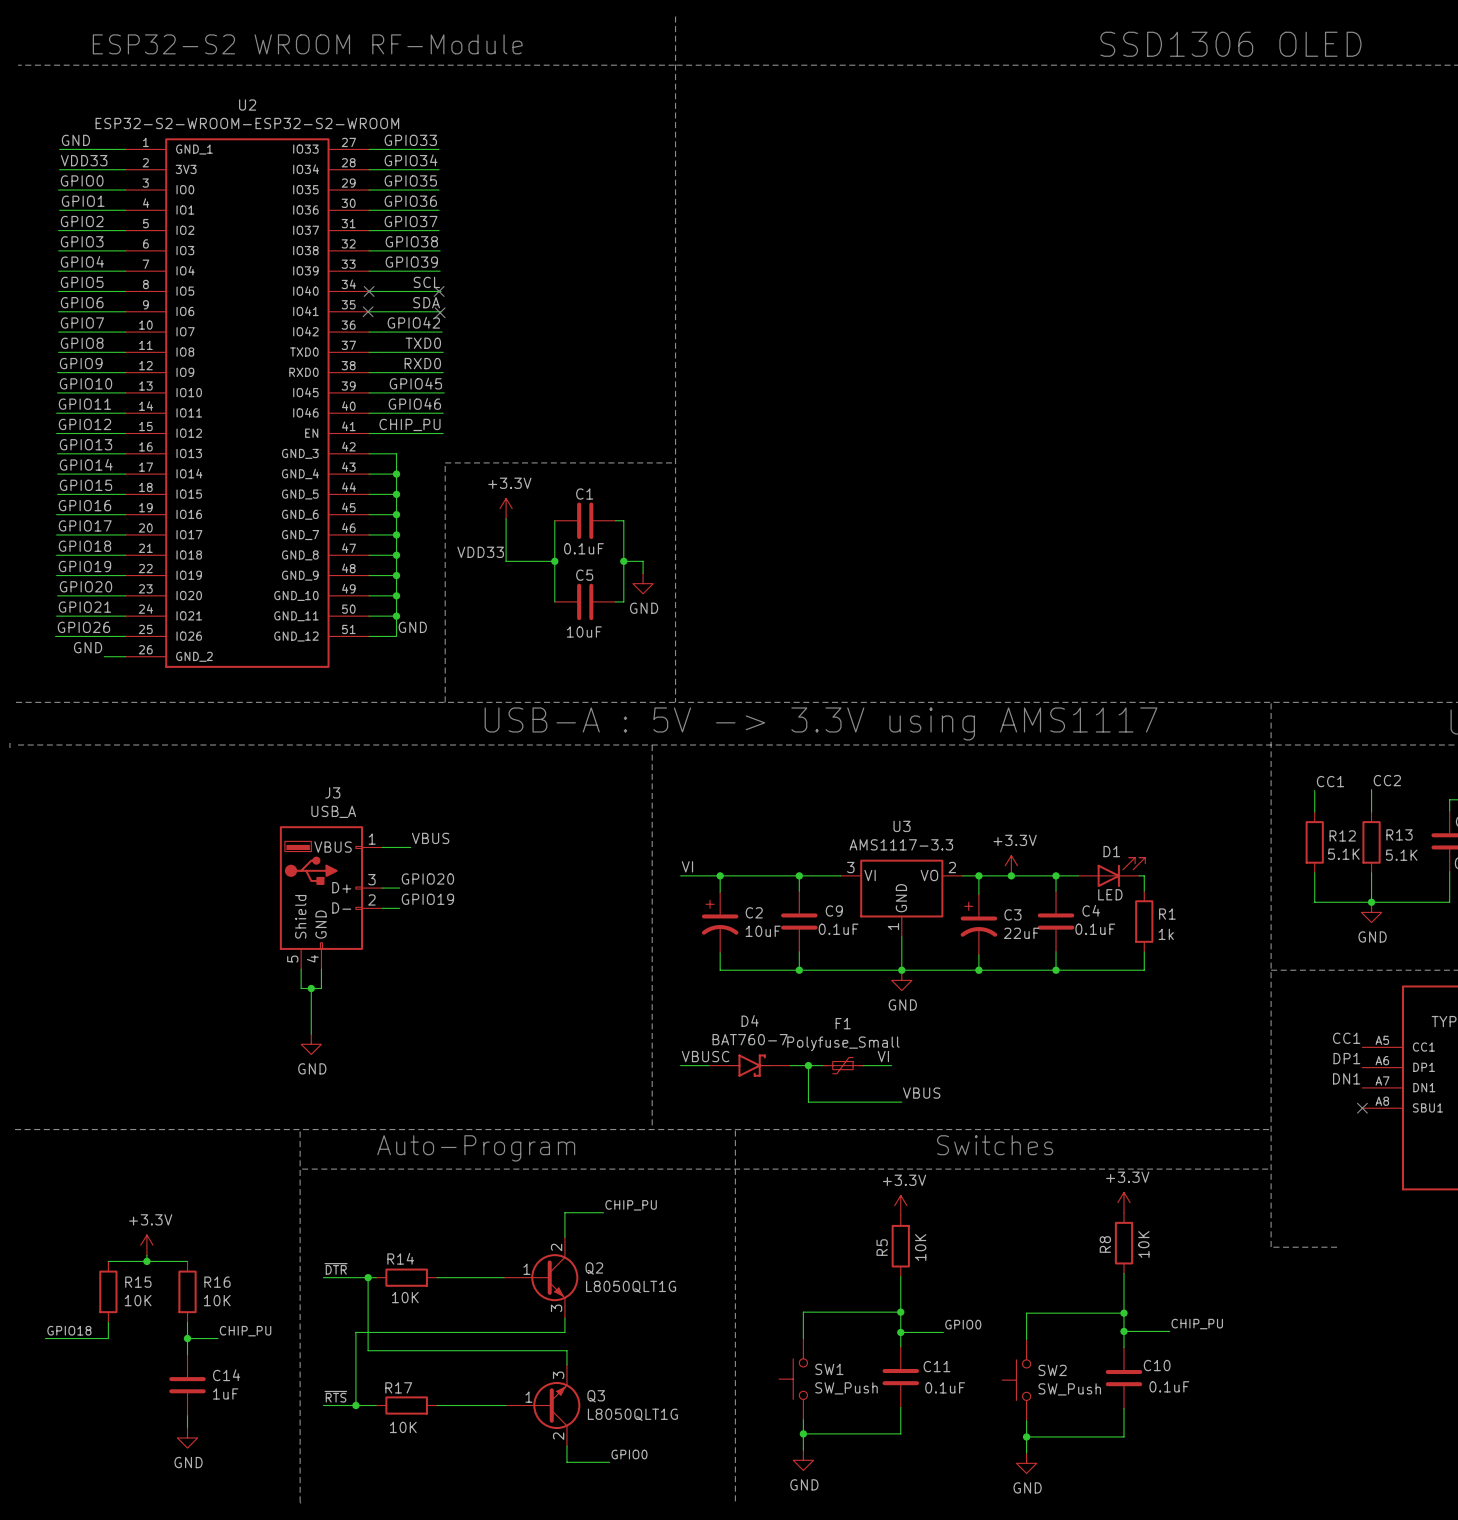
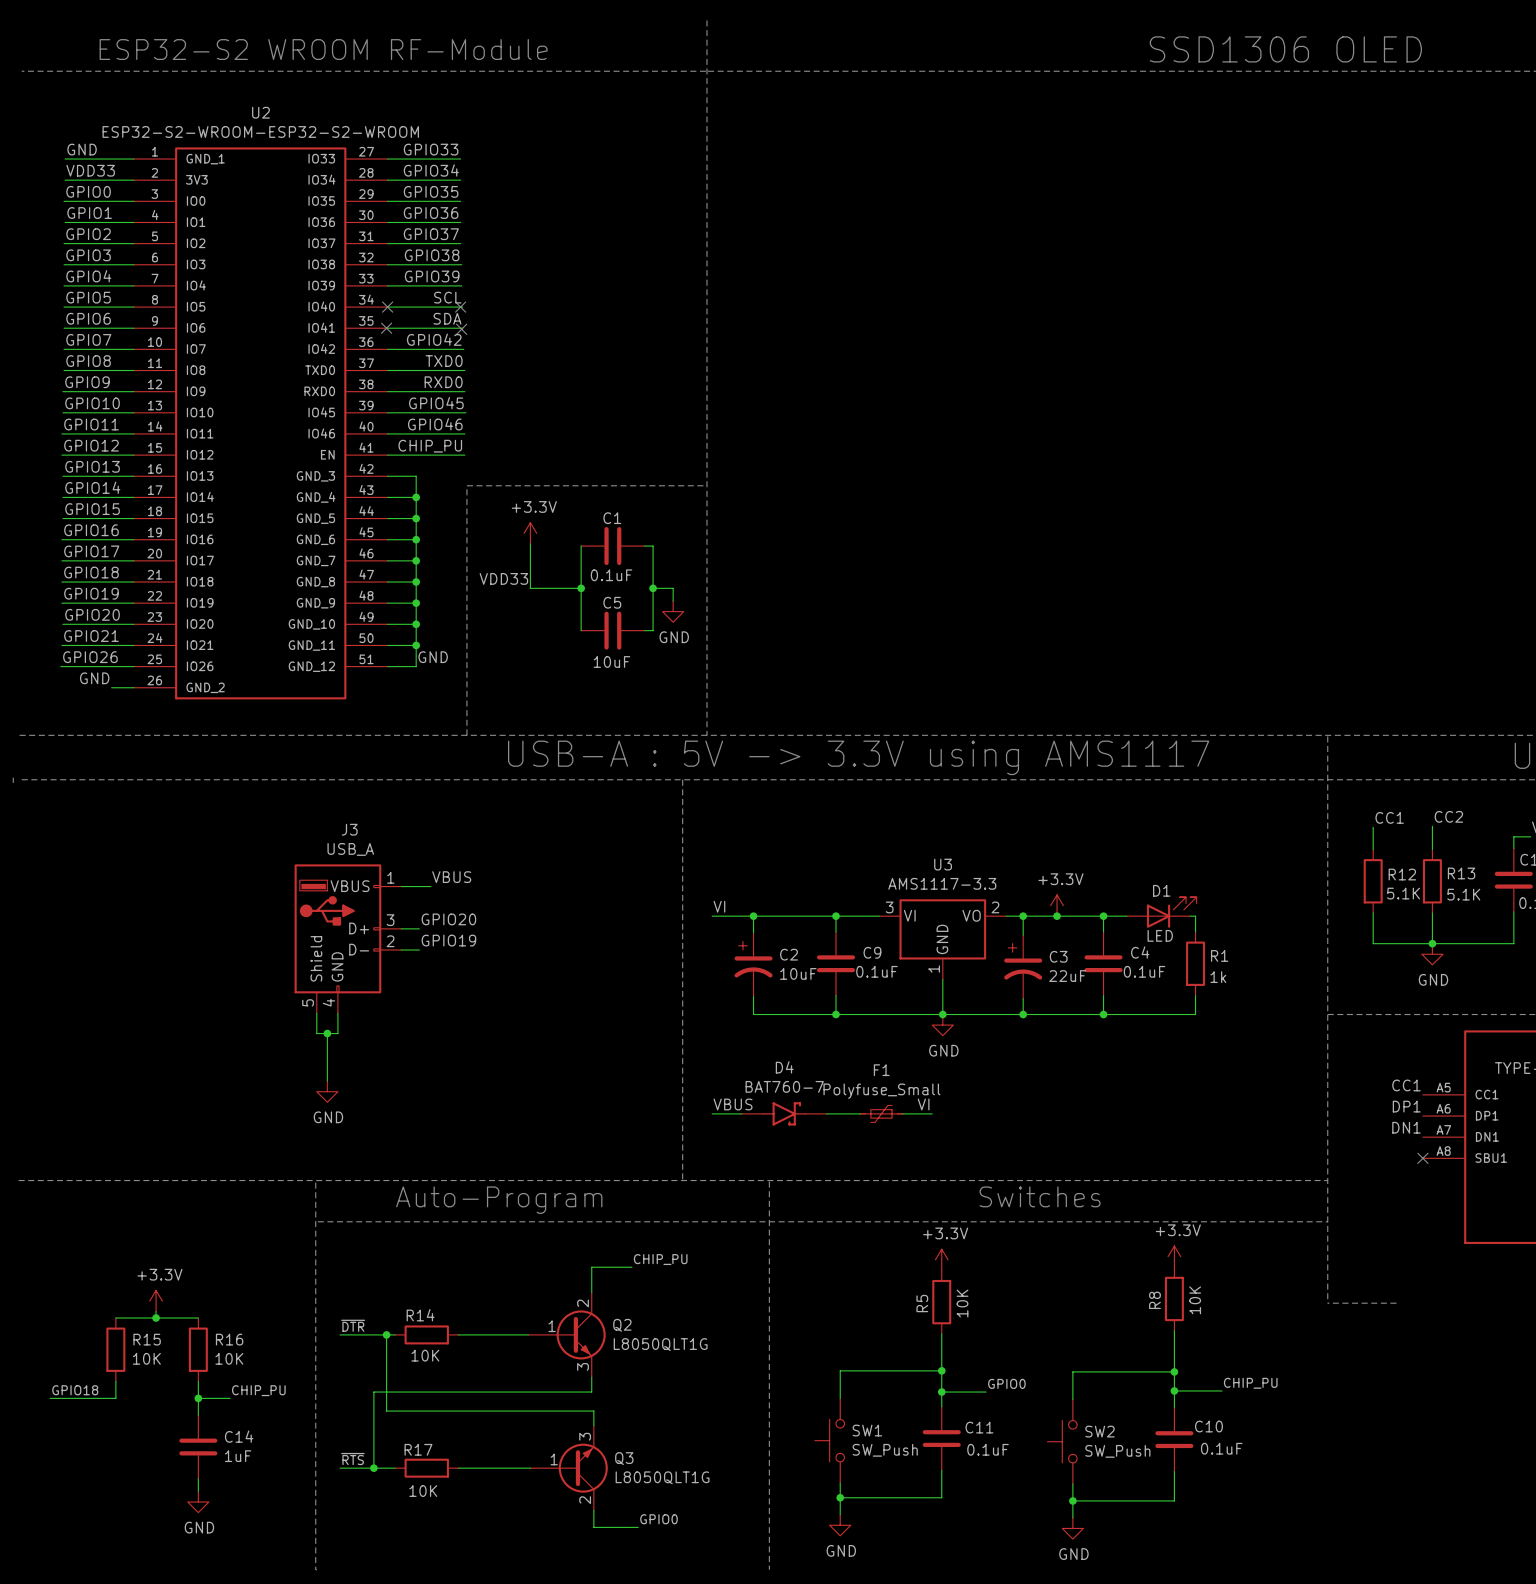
label: VBUSC (705, 1056) -> VBUS (733, 1104)
wire: (808, 1065) (808, 1102) (901, 1102) -> none
junction: (808, 1065) -> none
label: VBUS (921, 1093) -> none

